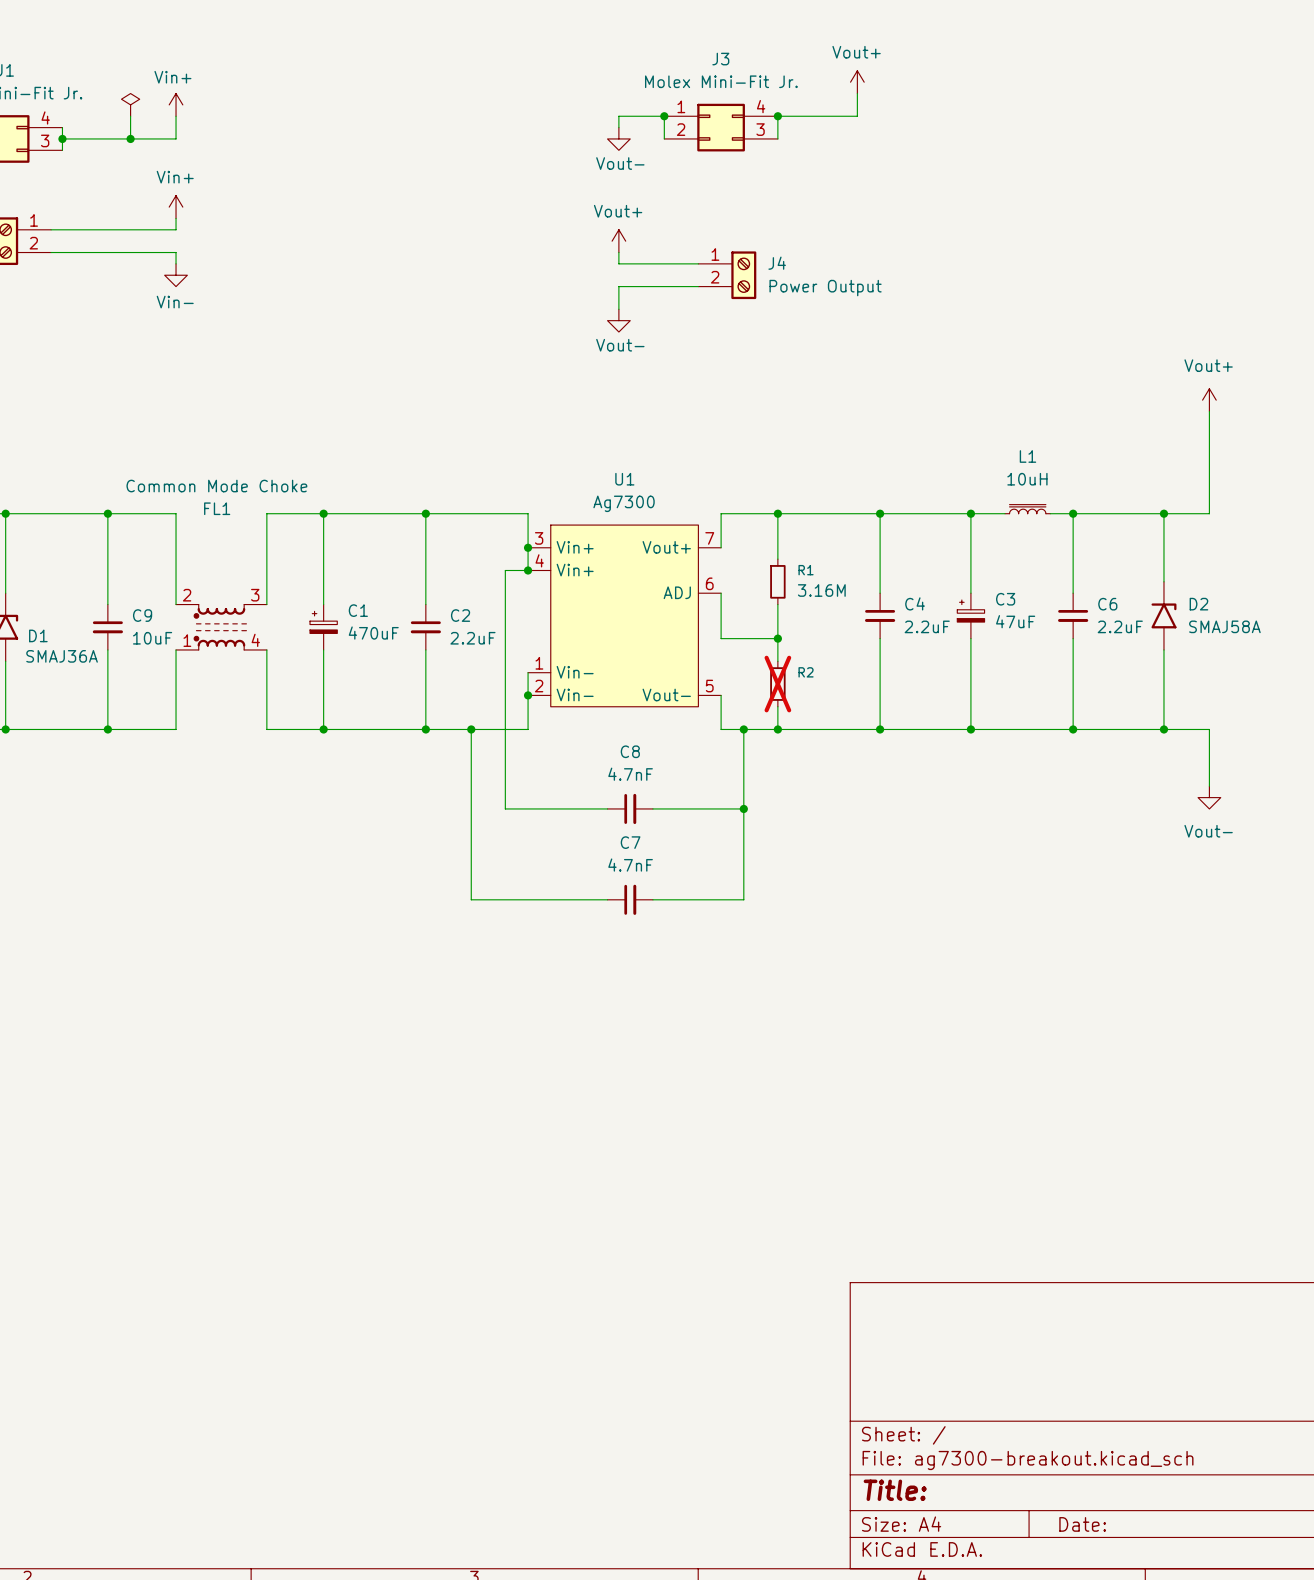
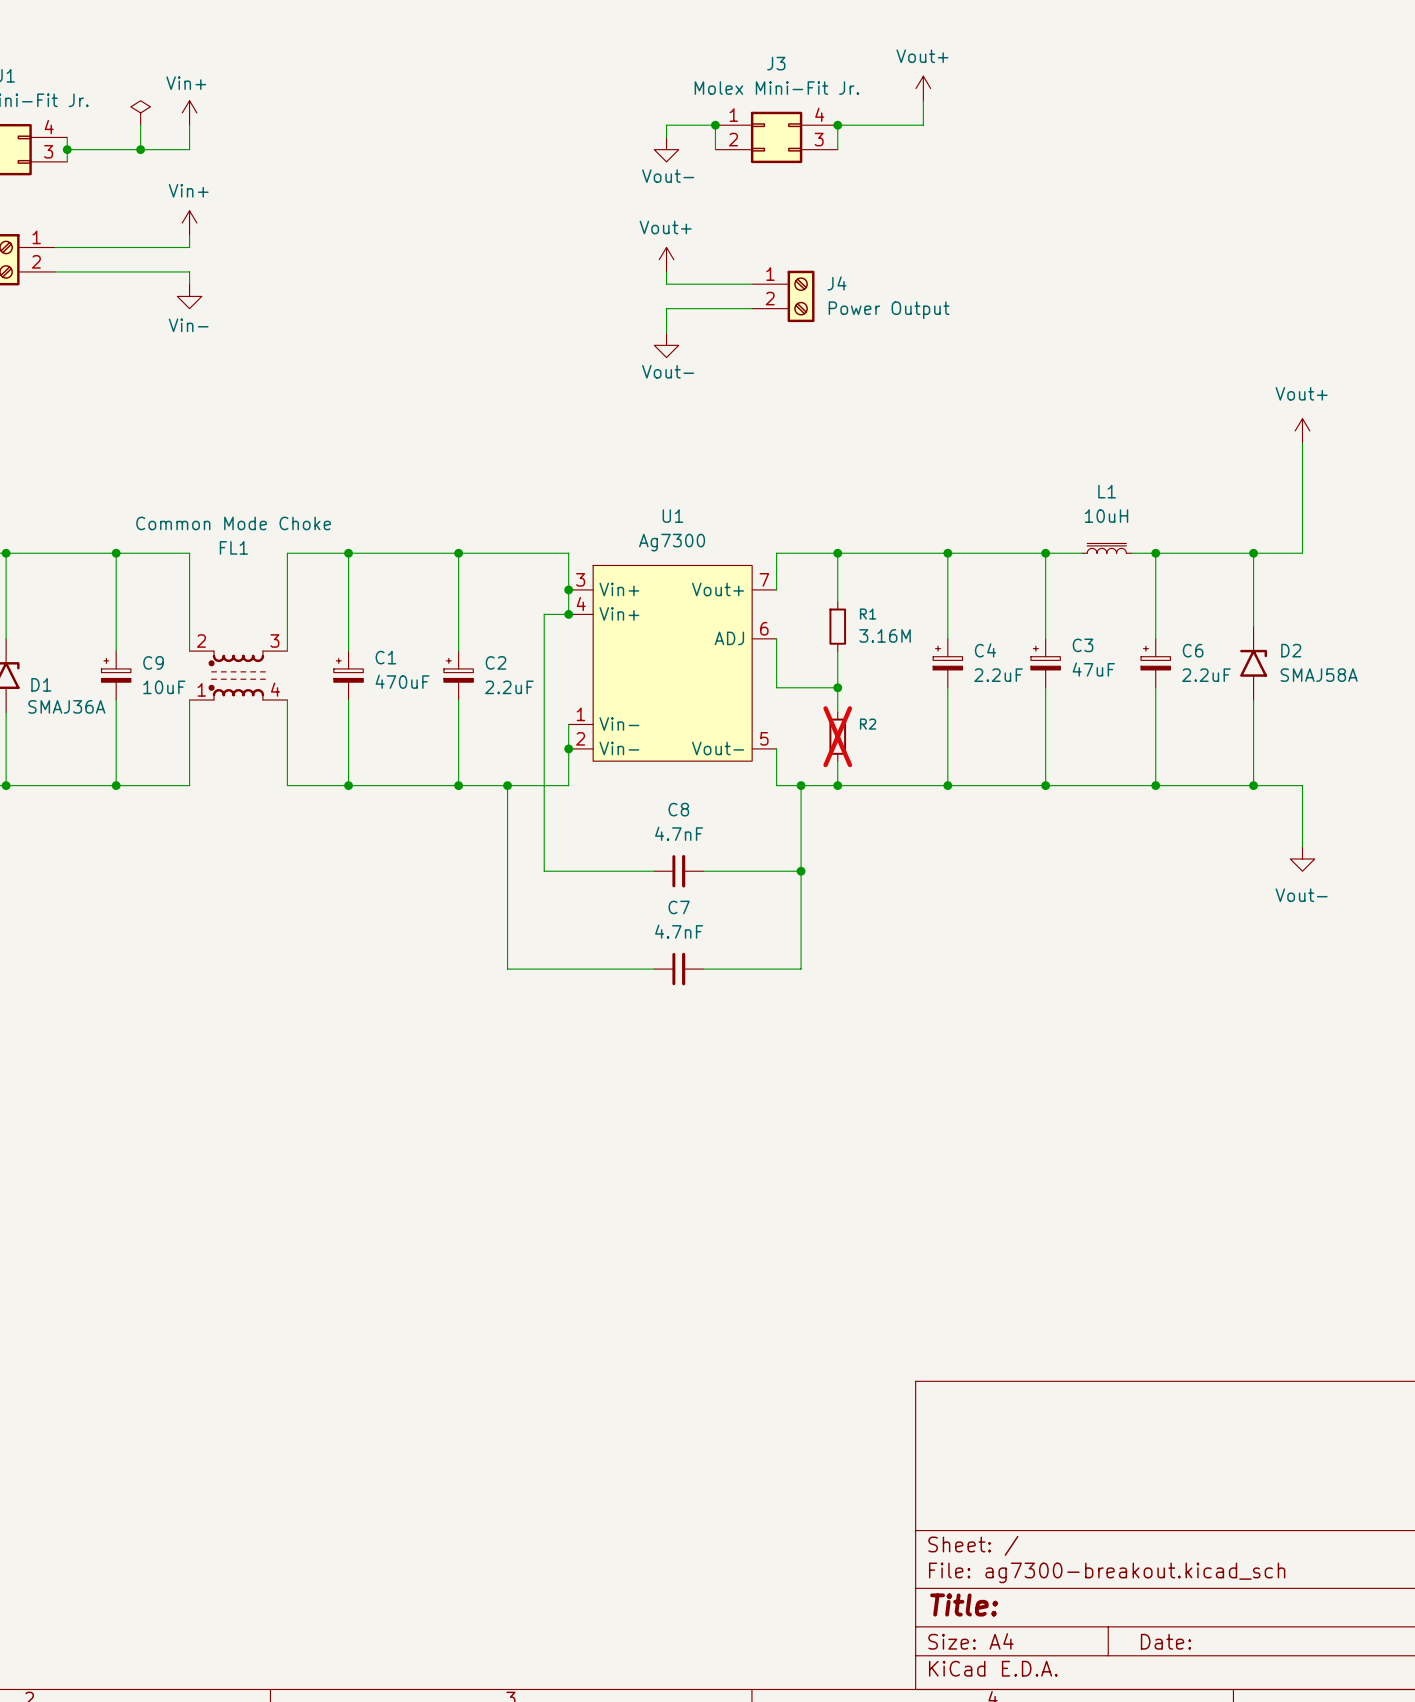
C4 symbol: [864, 593, 896, 639] -> [933, 638, 963, 688]
C6 symbol: [1058, 593, 1089, 639] -> [1141, 638, 1171, 688]
C9 symbol: [92, 604, 123, 650] -> [101, 651, 131, 701]
C2 symbol: [410, 604, 441, 650] -> [443, 651, 474, 701]

